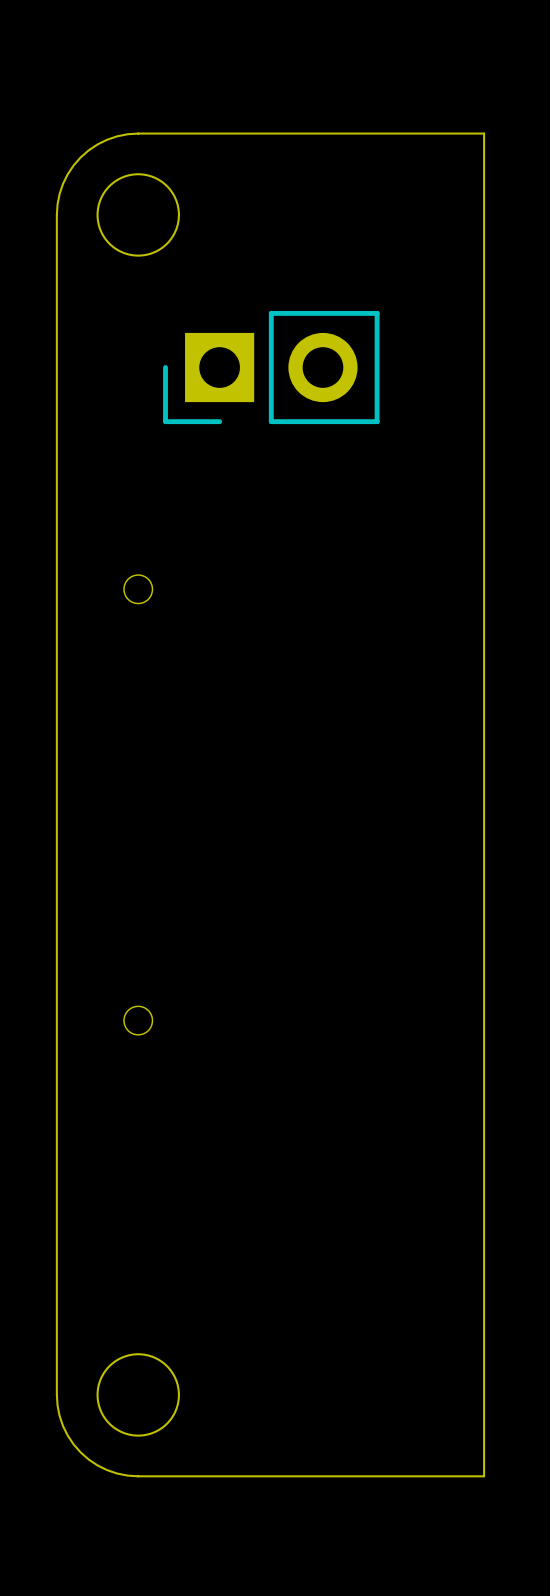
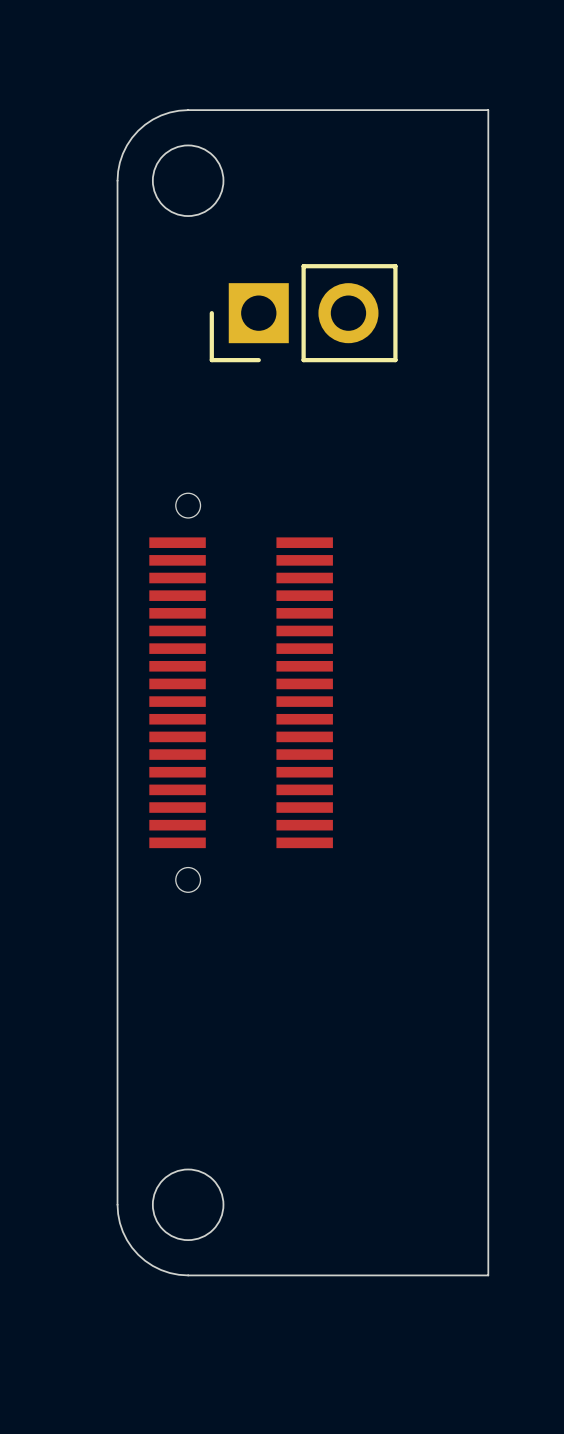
part: none -> (241, 692)

